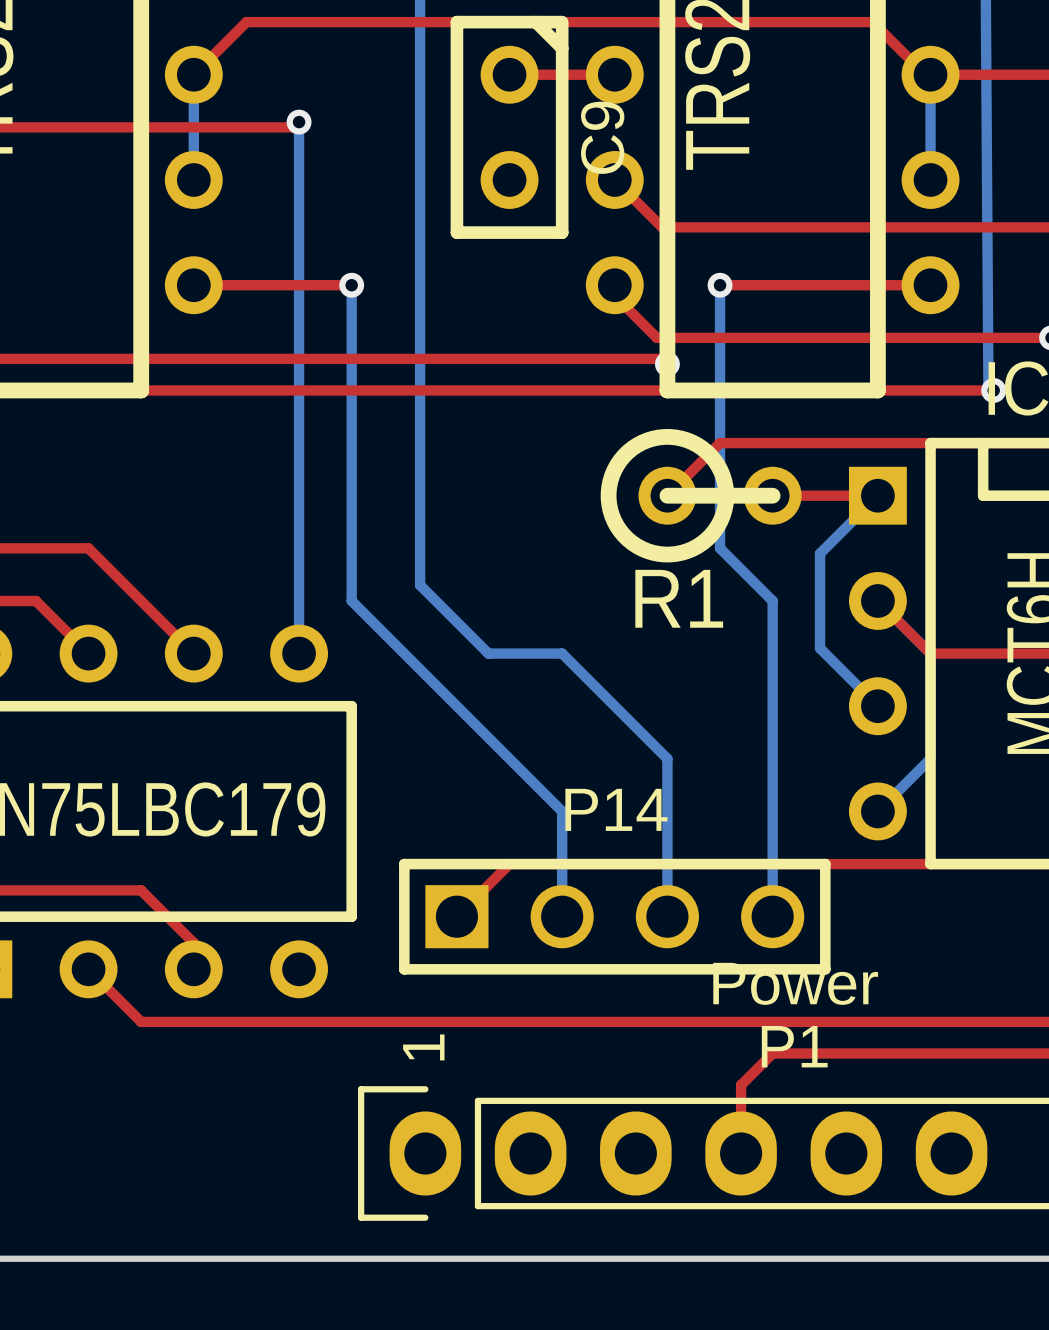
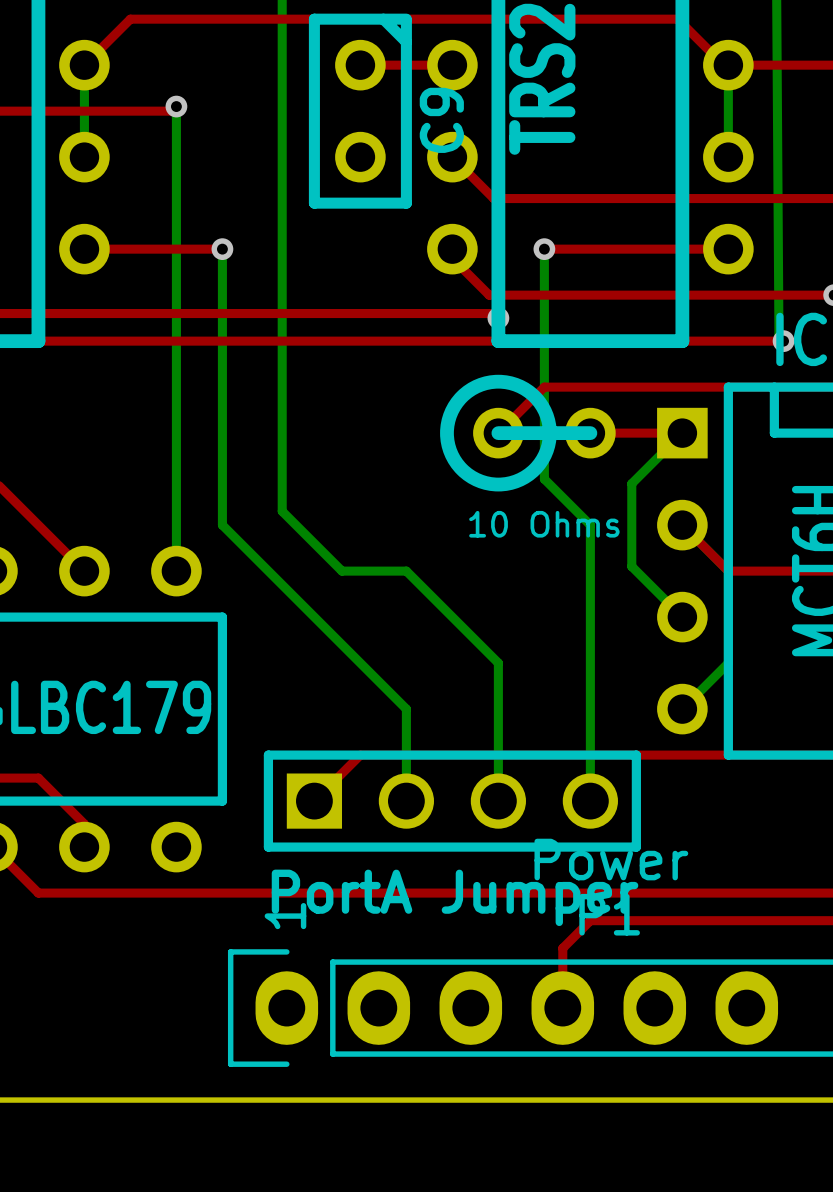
R1 name: R1 (679, 598) -> none
R1 value: none -> 10 Ohms (544, 524)
P14 name: P14 (616, 809) -> none
P14 value: none -> PortA Jumper (455, 897)

